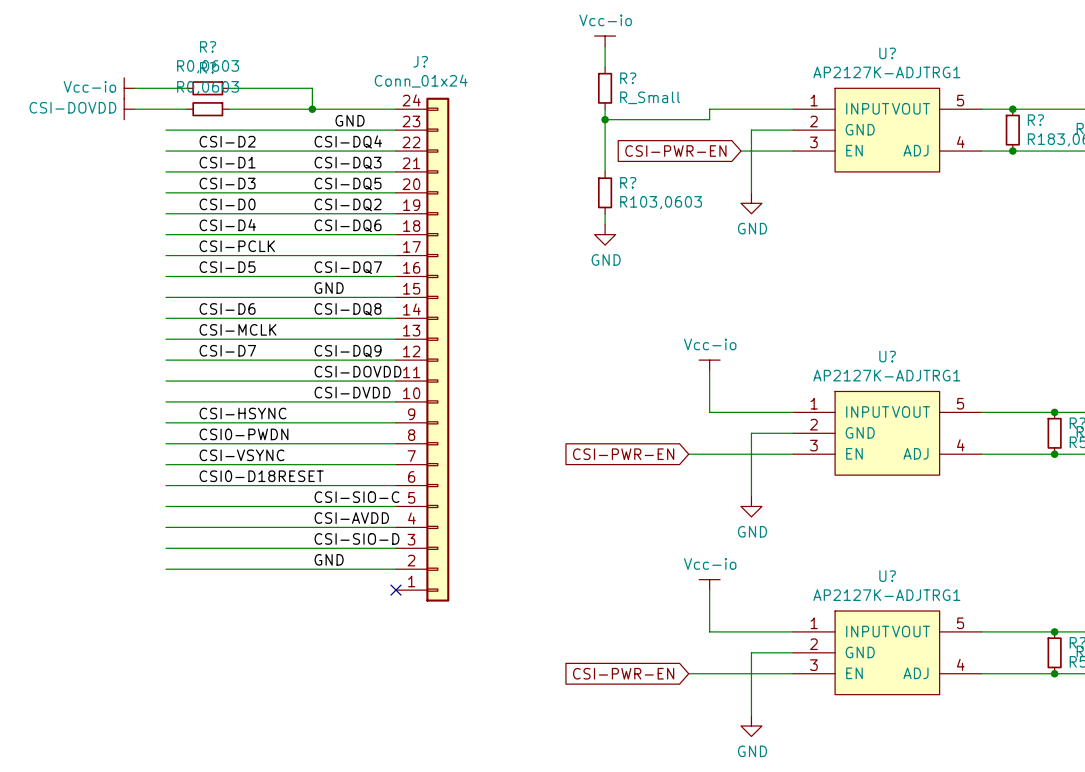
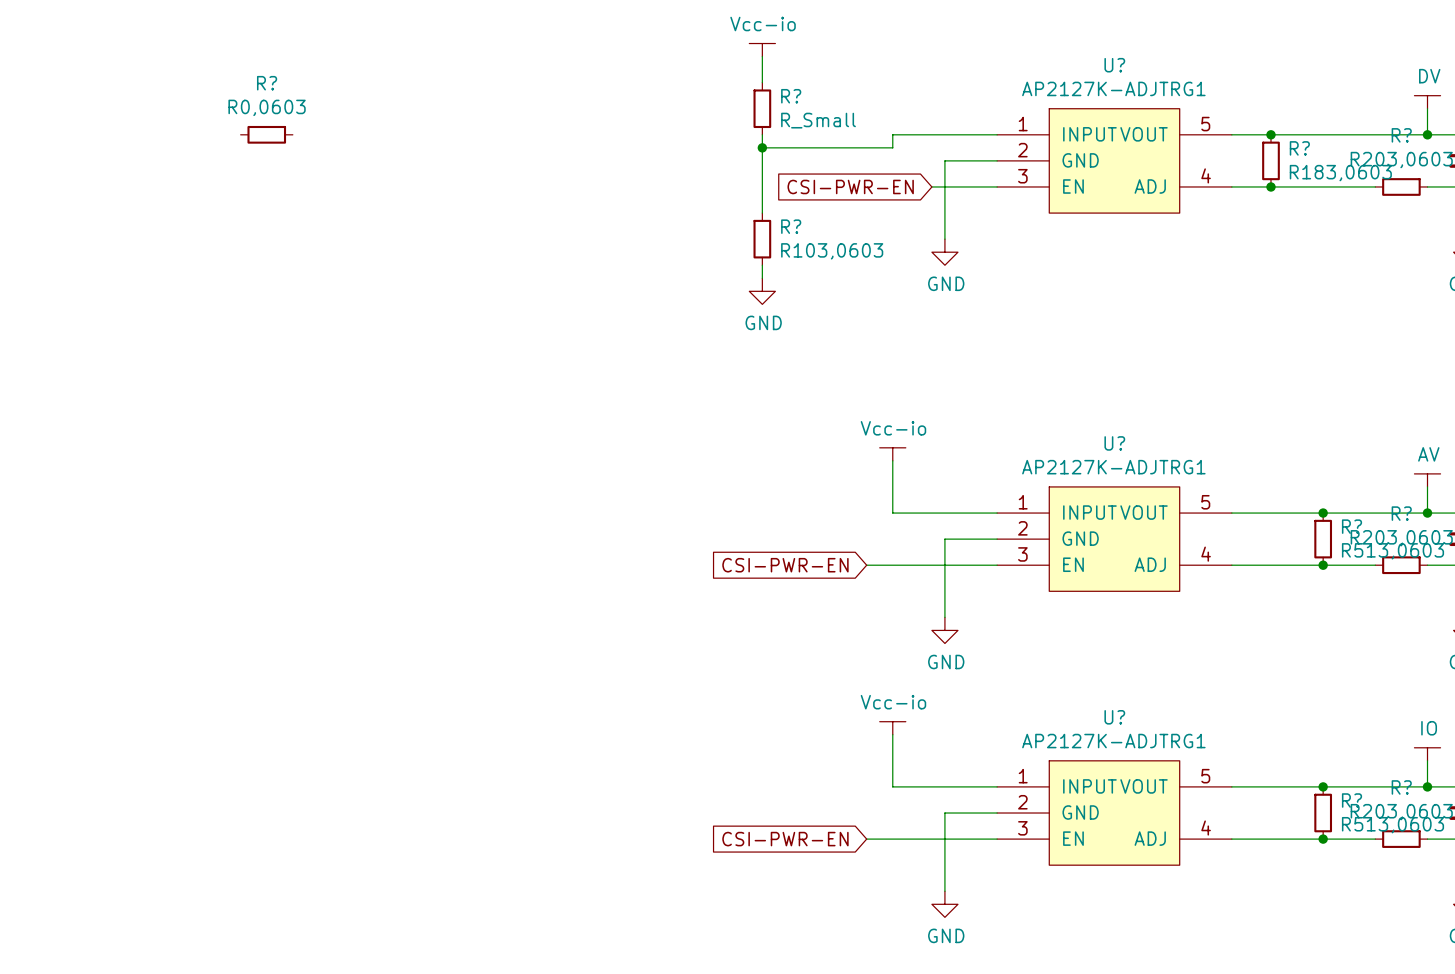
power symbol: Vcc-io (129, 88) -> none
wire: (134, 88) (186, 88) -> none
R?: R0,0603 (207, 88) -> none
wire: (228, 88) (312, 88) (312, 109) -> none
power symbol: CSI-DOVDD (129, 109) -> none
wire: (134, 109) (186, 109) -> none
wire: (228, 109) (396, 109) -> none
junction: (312, 109) -> none
label: GND (350, 120) -> none
wire: (166, 130) (396, 130) -> none
label: CSI-D2 (227, 141) -> none
label: CSI-DQ4 (348, 141) -> none
wire: (166, 151) (396, 151) -> none
label: CSI-D1 (227, 162) -> none
label: CSI-DQ3 (348, 163) -> none
wire: (166, 171) (396, 171) -> none
label: CSI-D3 (227, 183) -> none
label: CSI-DQ5 (348, 184) -> none
wire: (166, 192) (396, 192) -> none
label: CSI-D0 (227, 204) -> none
label: CSI-DQ2 (348, 204) -> none
wire: (166, 213) (396, 213) -> none
label: CSI-D4 (227, 225) -> none
label: CSI-DQ6 (348, 225) -> none
wire: (166, 234) (396, 234) -> none
label: CSI-PCLK (237, 246) -> none
wire: (166, 255) (396, 255) -> none
label: CSI-D5 (227, 267) -> none
label: CSI-DQ7 (348, 267) -> none
wire: (166, 276) (396, 276) -> none
label: GND (329, 288) -> none
wire: (166, 297) (396, 297) -> none
label: CSI-D6 (227, 308) -> none
label: CSI-DQ8 (348, 309) -> none
wire: (166, 318) (396, 318) -> none
label: CSI-MCLK (238, 329) -> none
wire: (166, 339) (396, 339) -> none
J?: Conn_01x24 (422, 349) -> none
label: CSI-D7 (227, 350) -> none
label: CSI-DQ9 (348, 351) -> none
wire: (166, 360) (396, 360) -> none
label: CSI-DOVDD (358, 371) -> none
wire: (166, 381) (396, 381) -> none
label: CSI-DVDD (352, 392) -> none
wire: (166, 401) (396, 401) -> none
label: CSI-HSYNC (243, 413) -> none
wire: (166, 422) (396, 422) -> none
label: CSI0-PWDN (244, 434) -> none
wire: (166, 443) (396, 443) -> none
label: CSI-VSYNC (242, 455) -> none
wire: (166, 464) (396, 464) -> none
label: CSI0-D18RESET (261, 476) -> none
wire: (166, 485) (396, 485) -> none
label: CSI-SIO-C (357, 497) -> none
wire: (166, 506) (396, 506) -> none
label: CSI-AVDD (351, 518) -> none
wire: (166, 527) (396, 527) -> none
label: CSI-SIO-D (357, 538) -> none
wire: (166, 548) (396, 548) -> none
label: GND (329, 559) -> none
wire: (166, 569) (396, 569) -> none
no-connect mark: (396, 590) -> none

